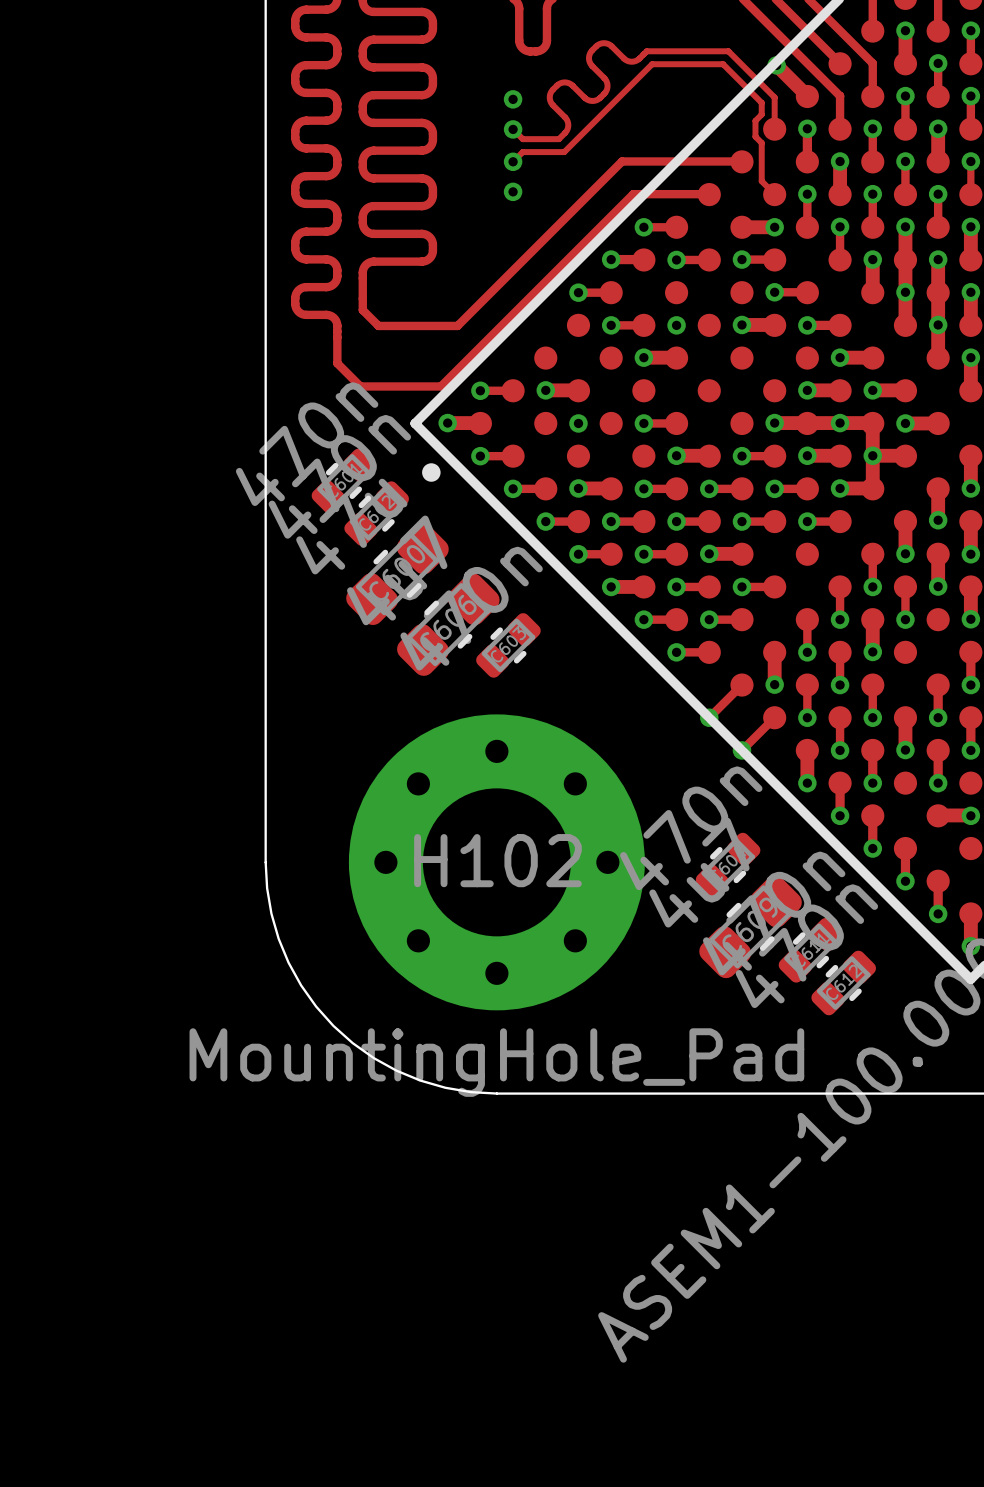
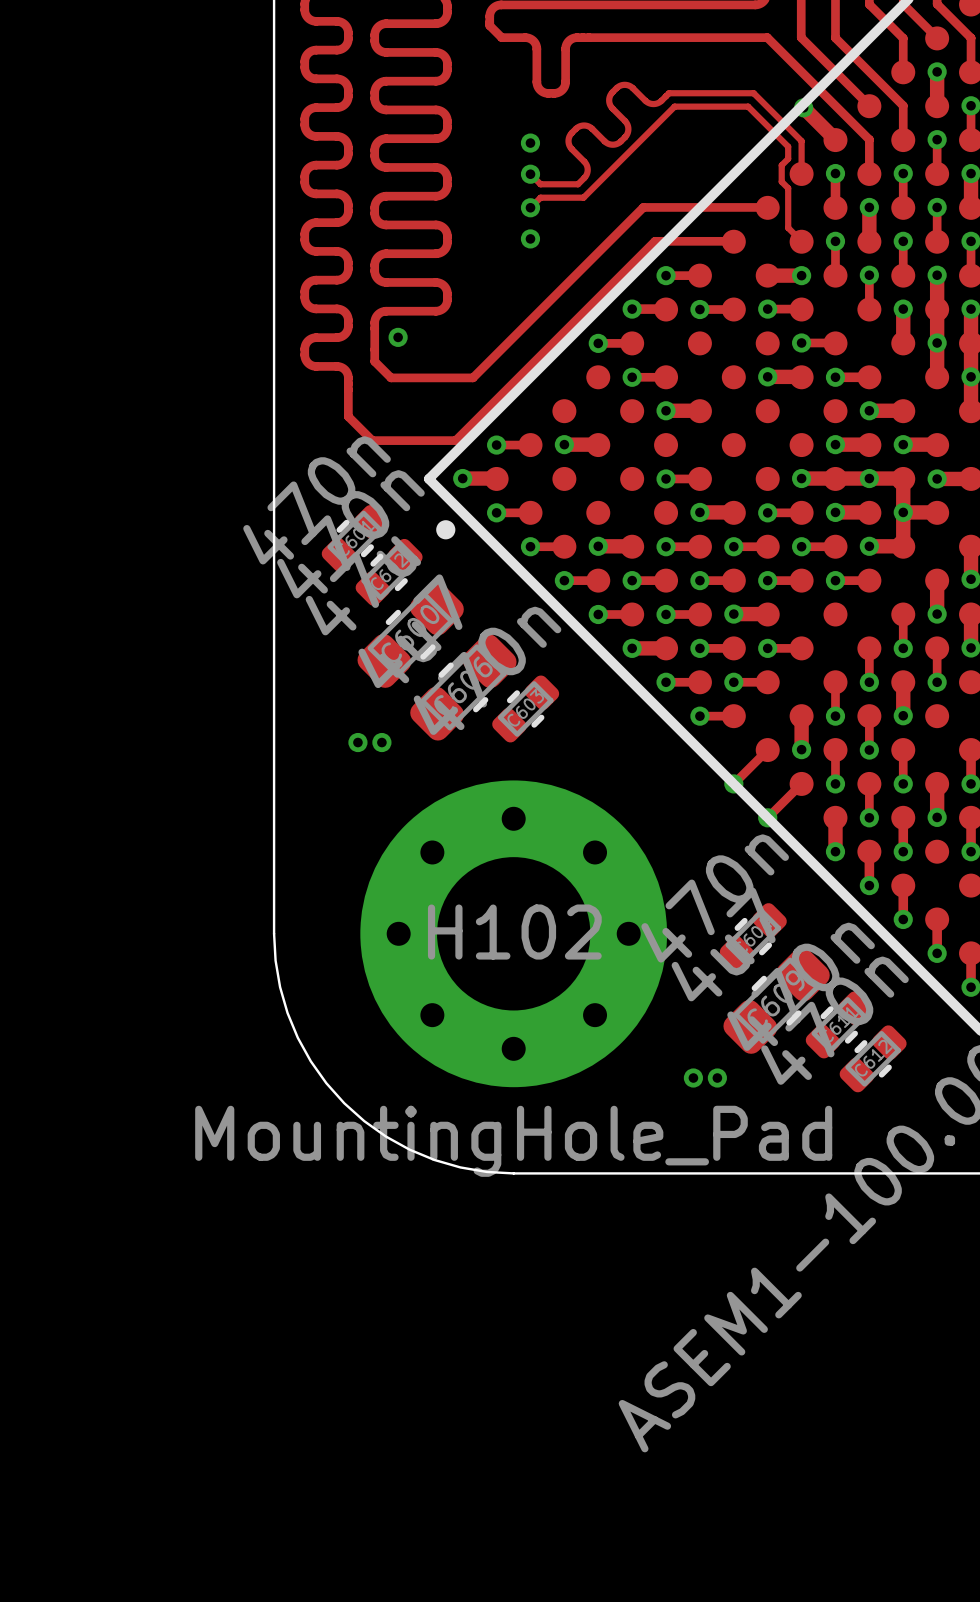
via: none -> (398, 337)
via: (676, 325) -> none
via: (578, 423) -> none
via: none -> (357, 742)
via: none -> (381, 742)
via: none -> (693, 1078)
via: none -> (717, 1078)

